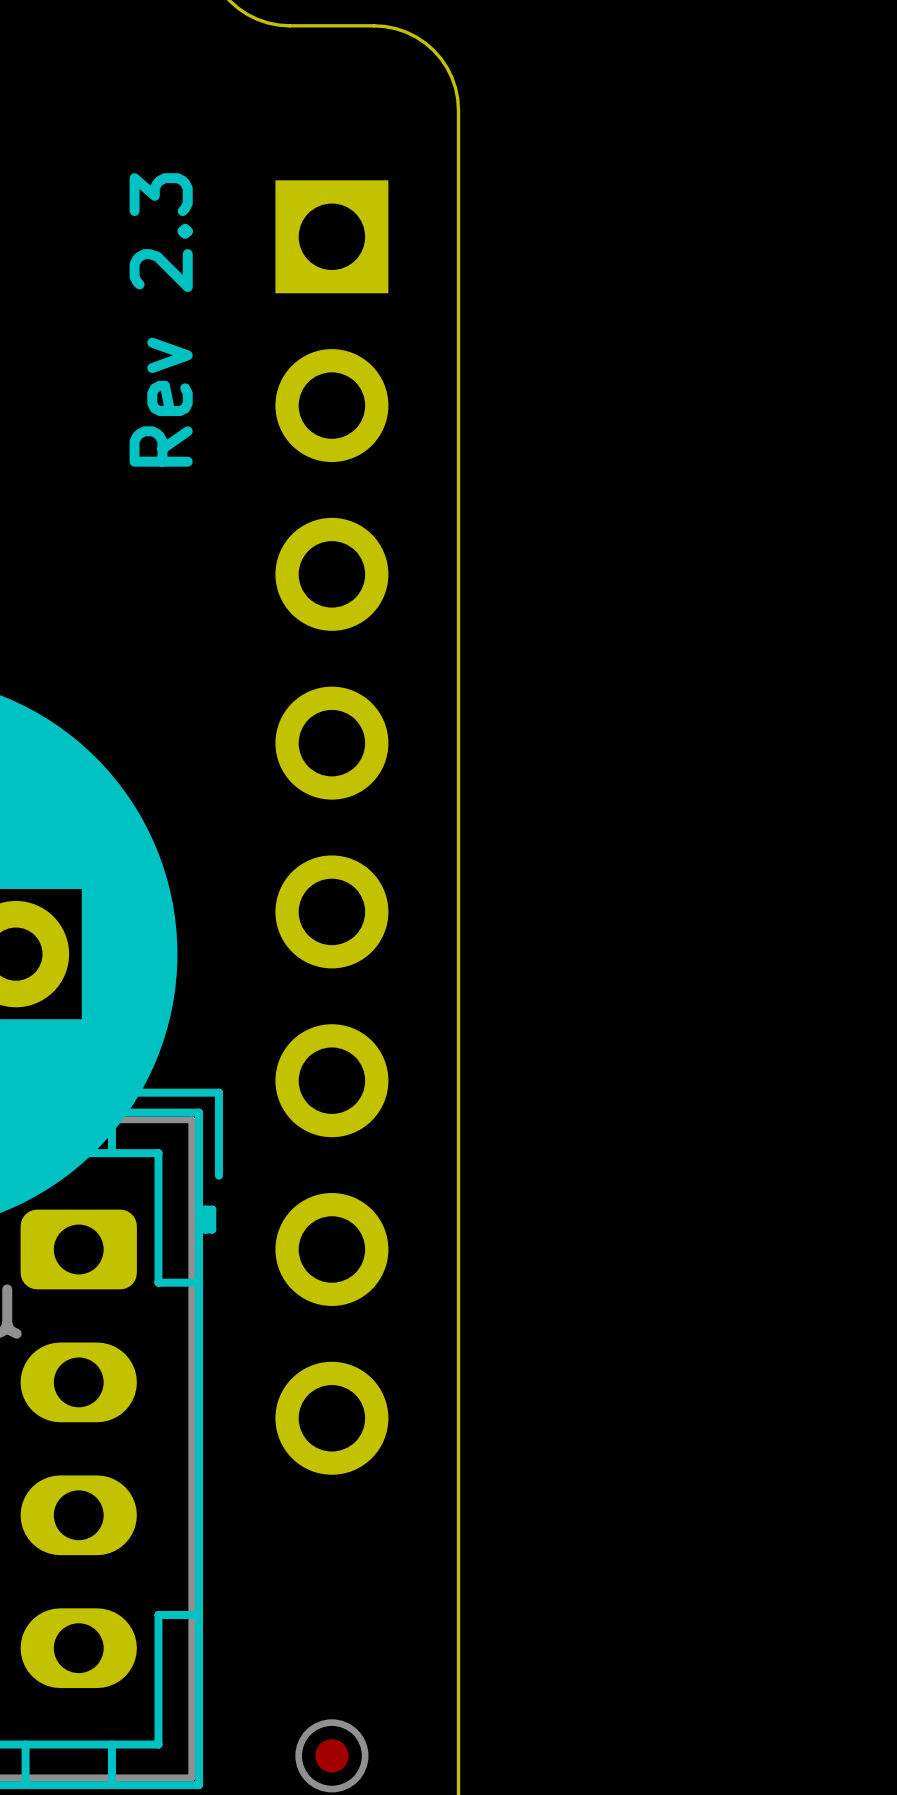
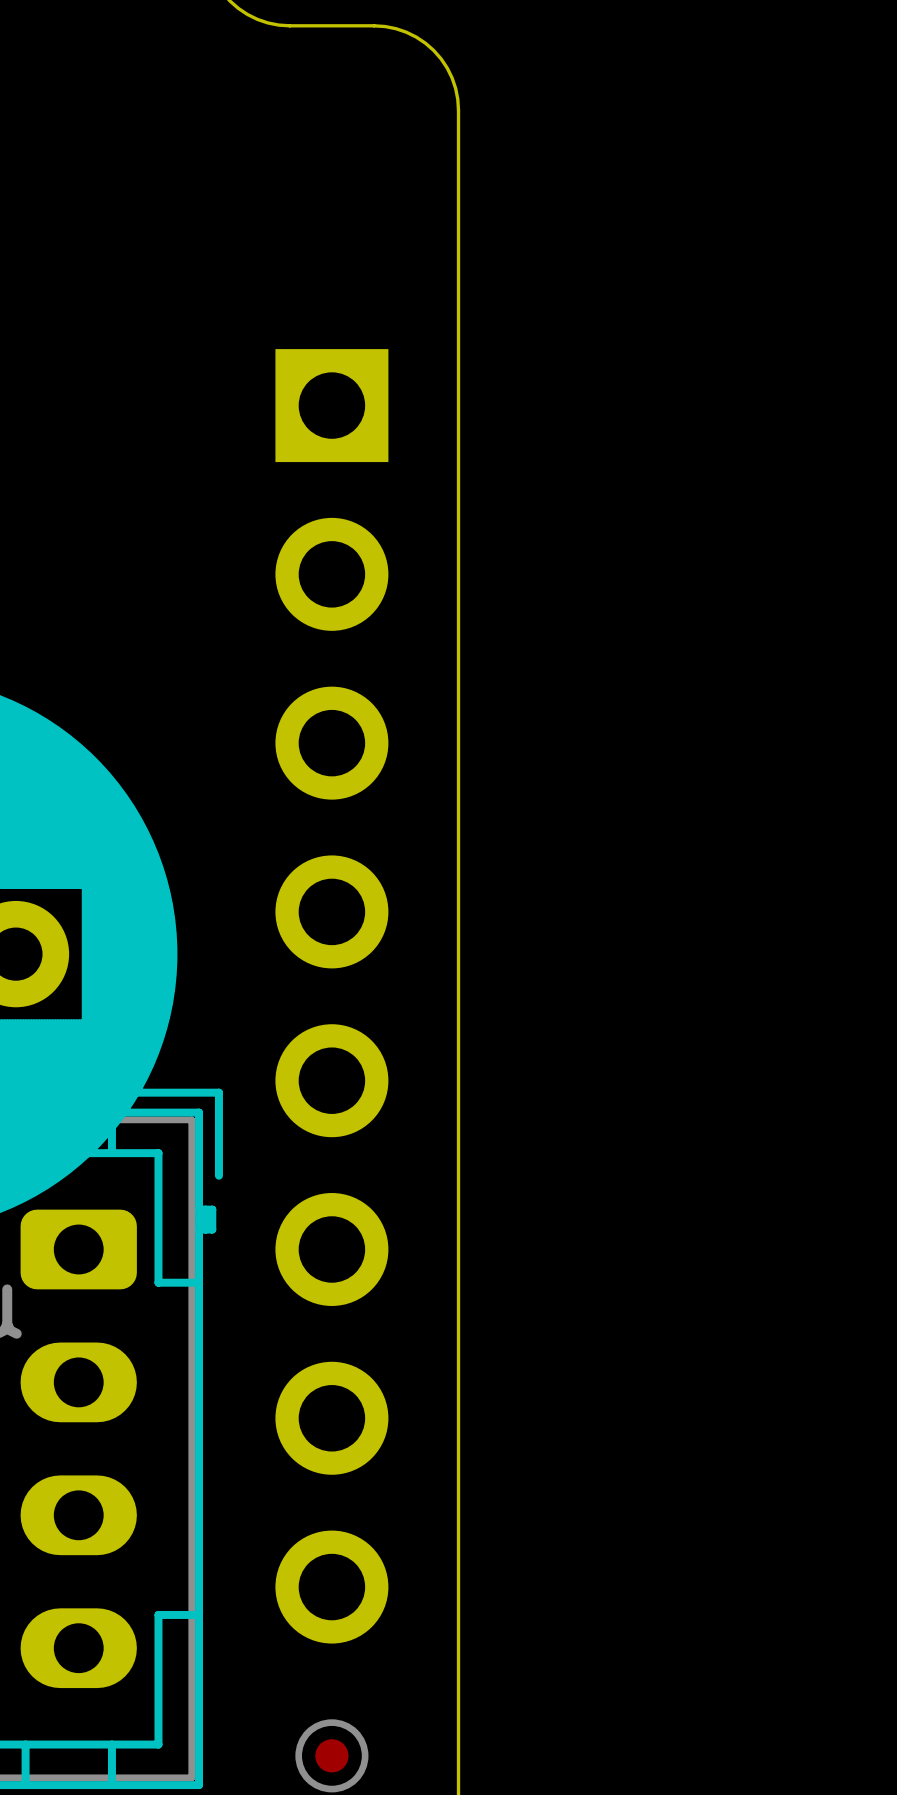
text: Rev 2.3 (161, 319) -> none
part position: (331, 827) -> (331, 996)

